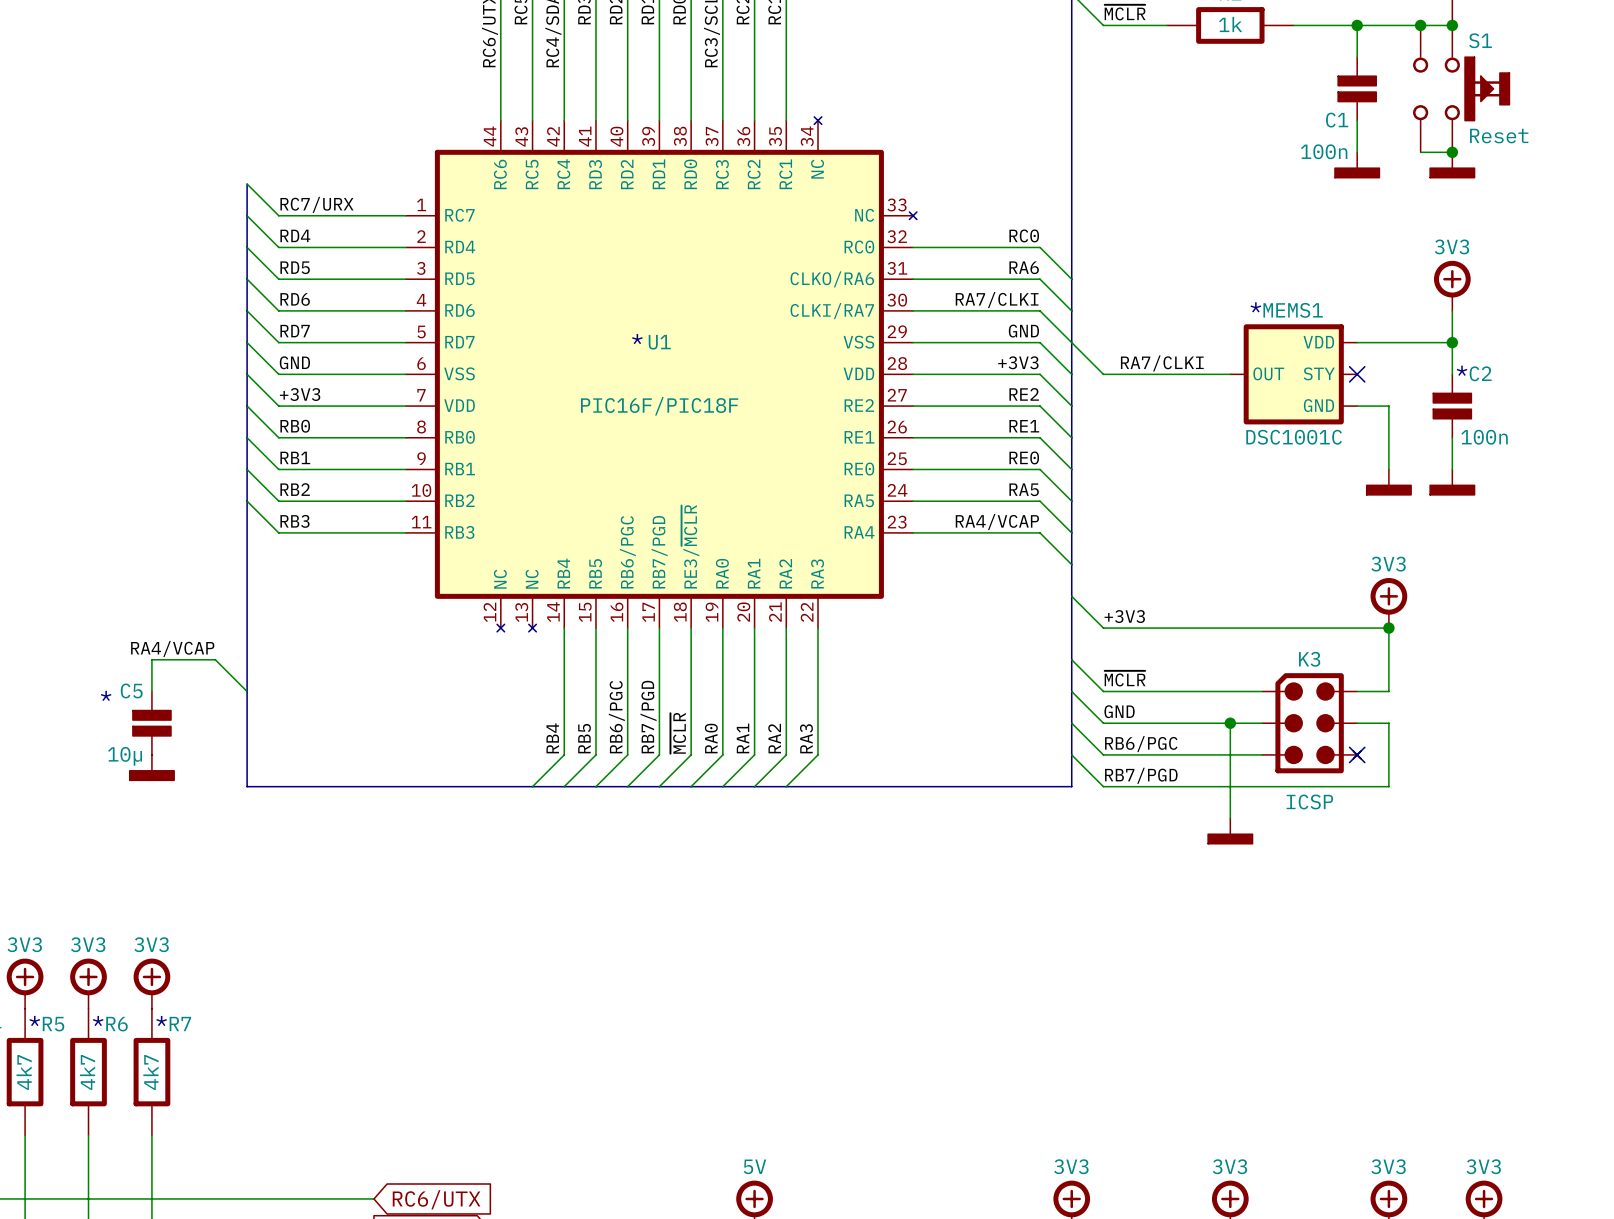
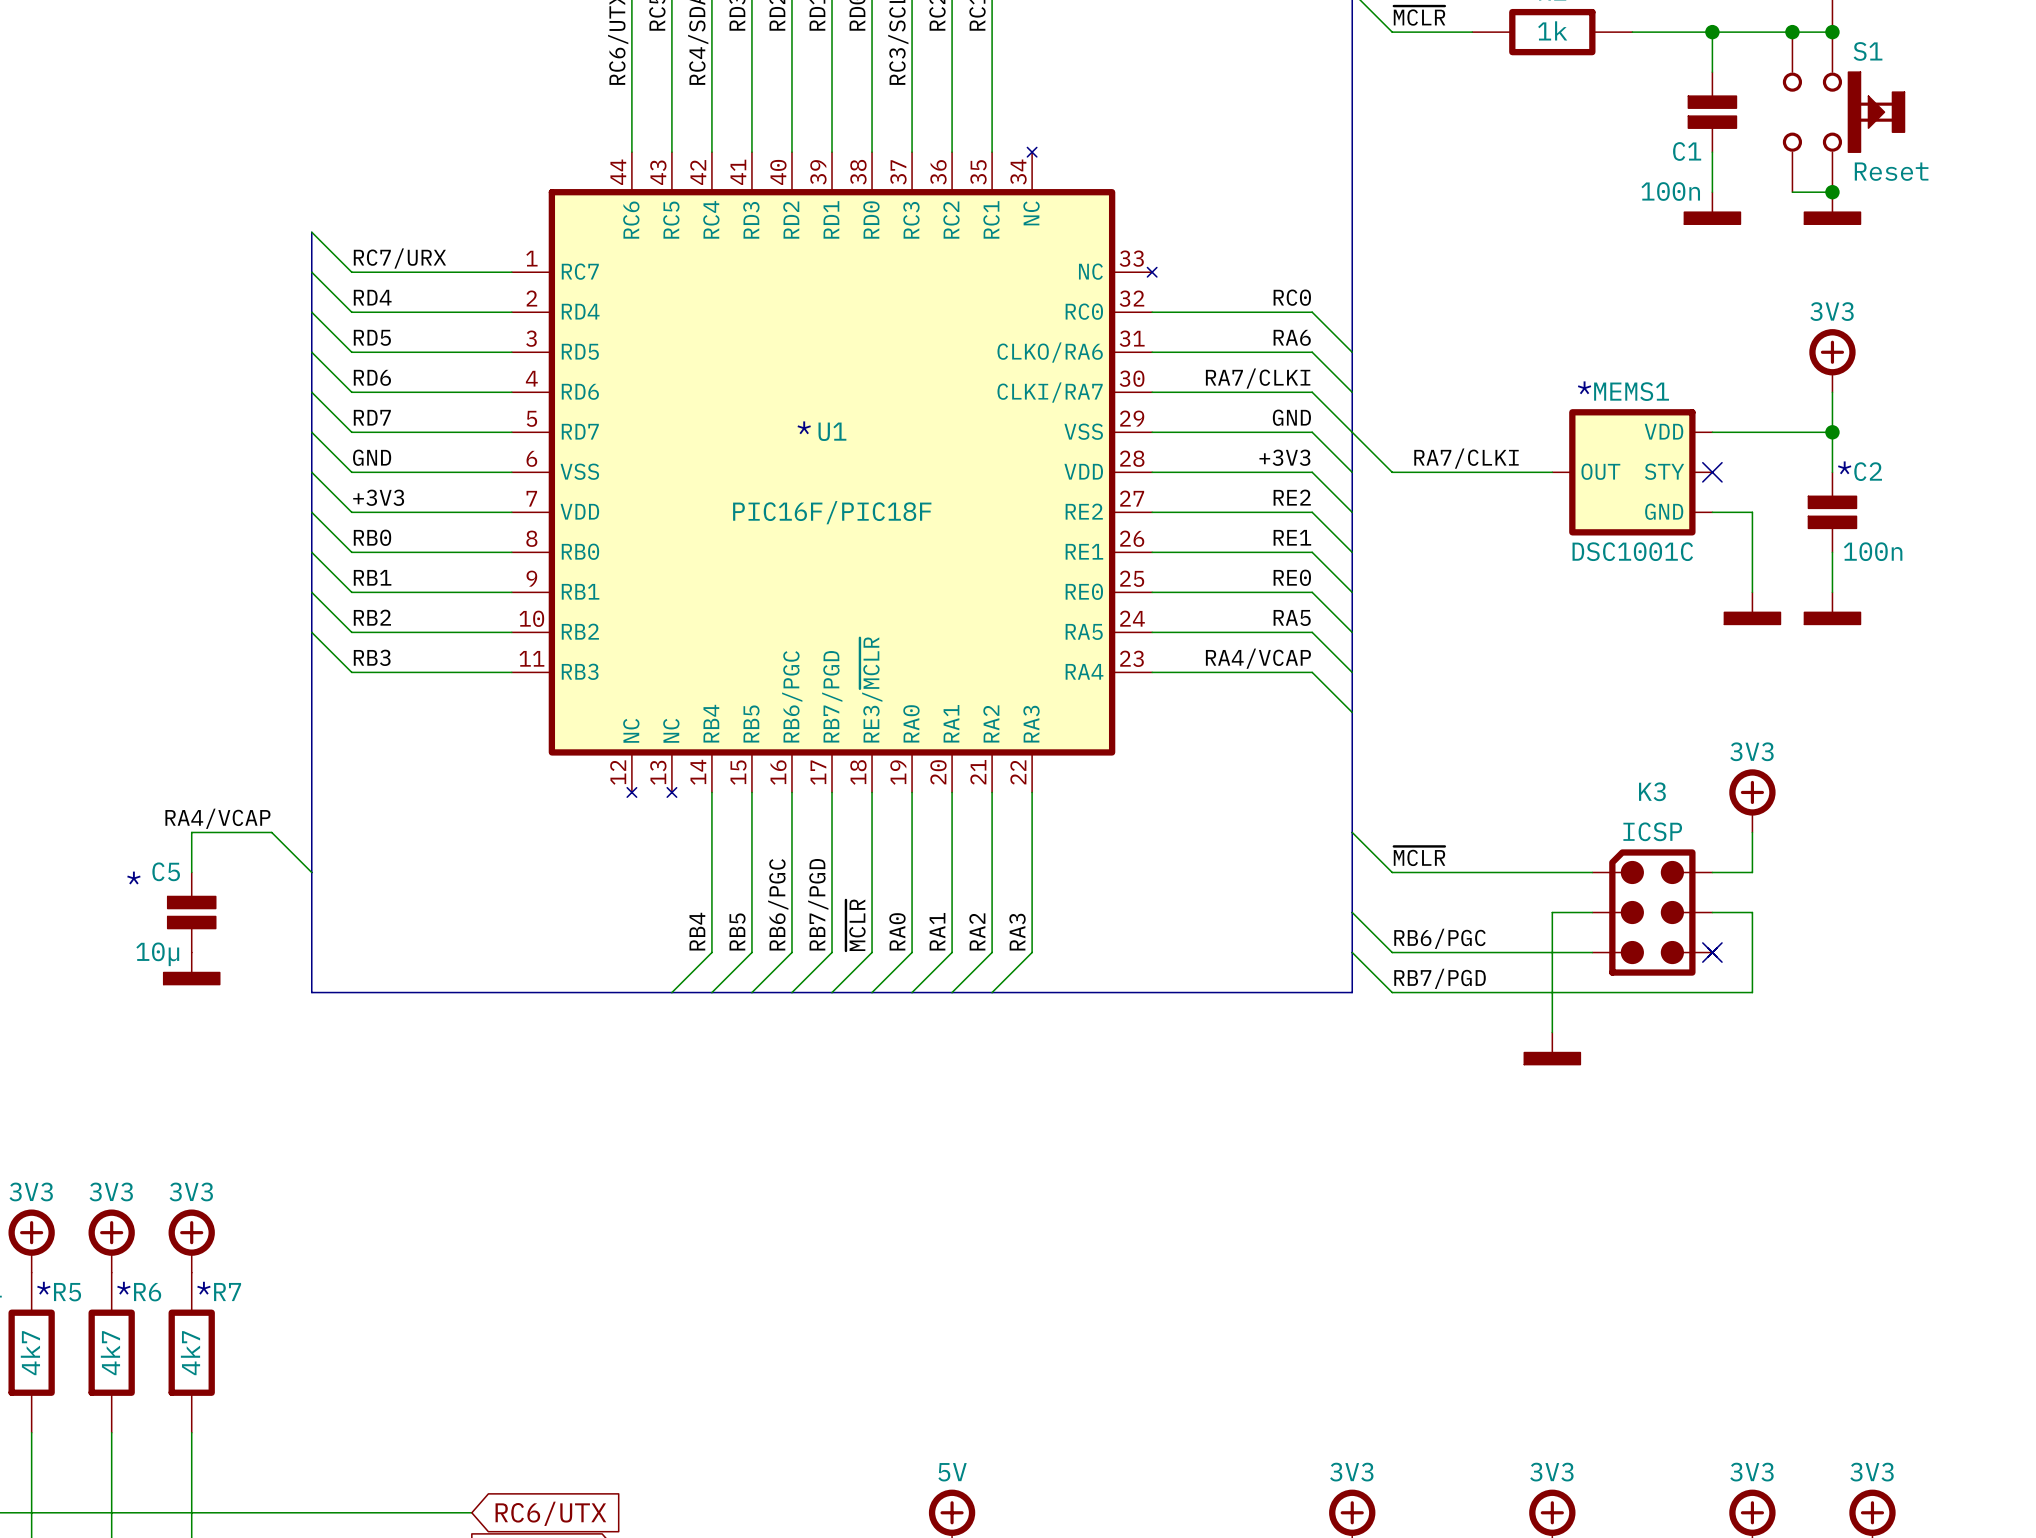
wire: (1071, 596) (1103, 628) (1388, 628) (1388, 659) -> none
power symbol position: (1388, 603) -> (1752, 800)
label: +3V3 (1124, 616) -> none
junction: (1388, 628) -> none
K3 name position: K3 (1309, 659) -> K3 (1652, 791)
wire: (1071, 691) (1103, 723) (1230, 723) -> none
label: GND (1119, 711) -> none
junction: (1230, 723) -> none
K3 value position: ICSP (1309, 801) -> ICSP (1652, 831)

